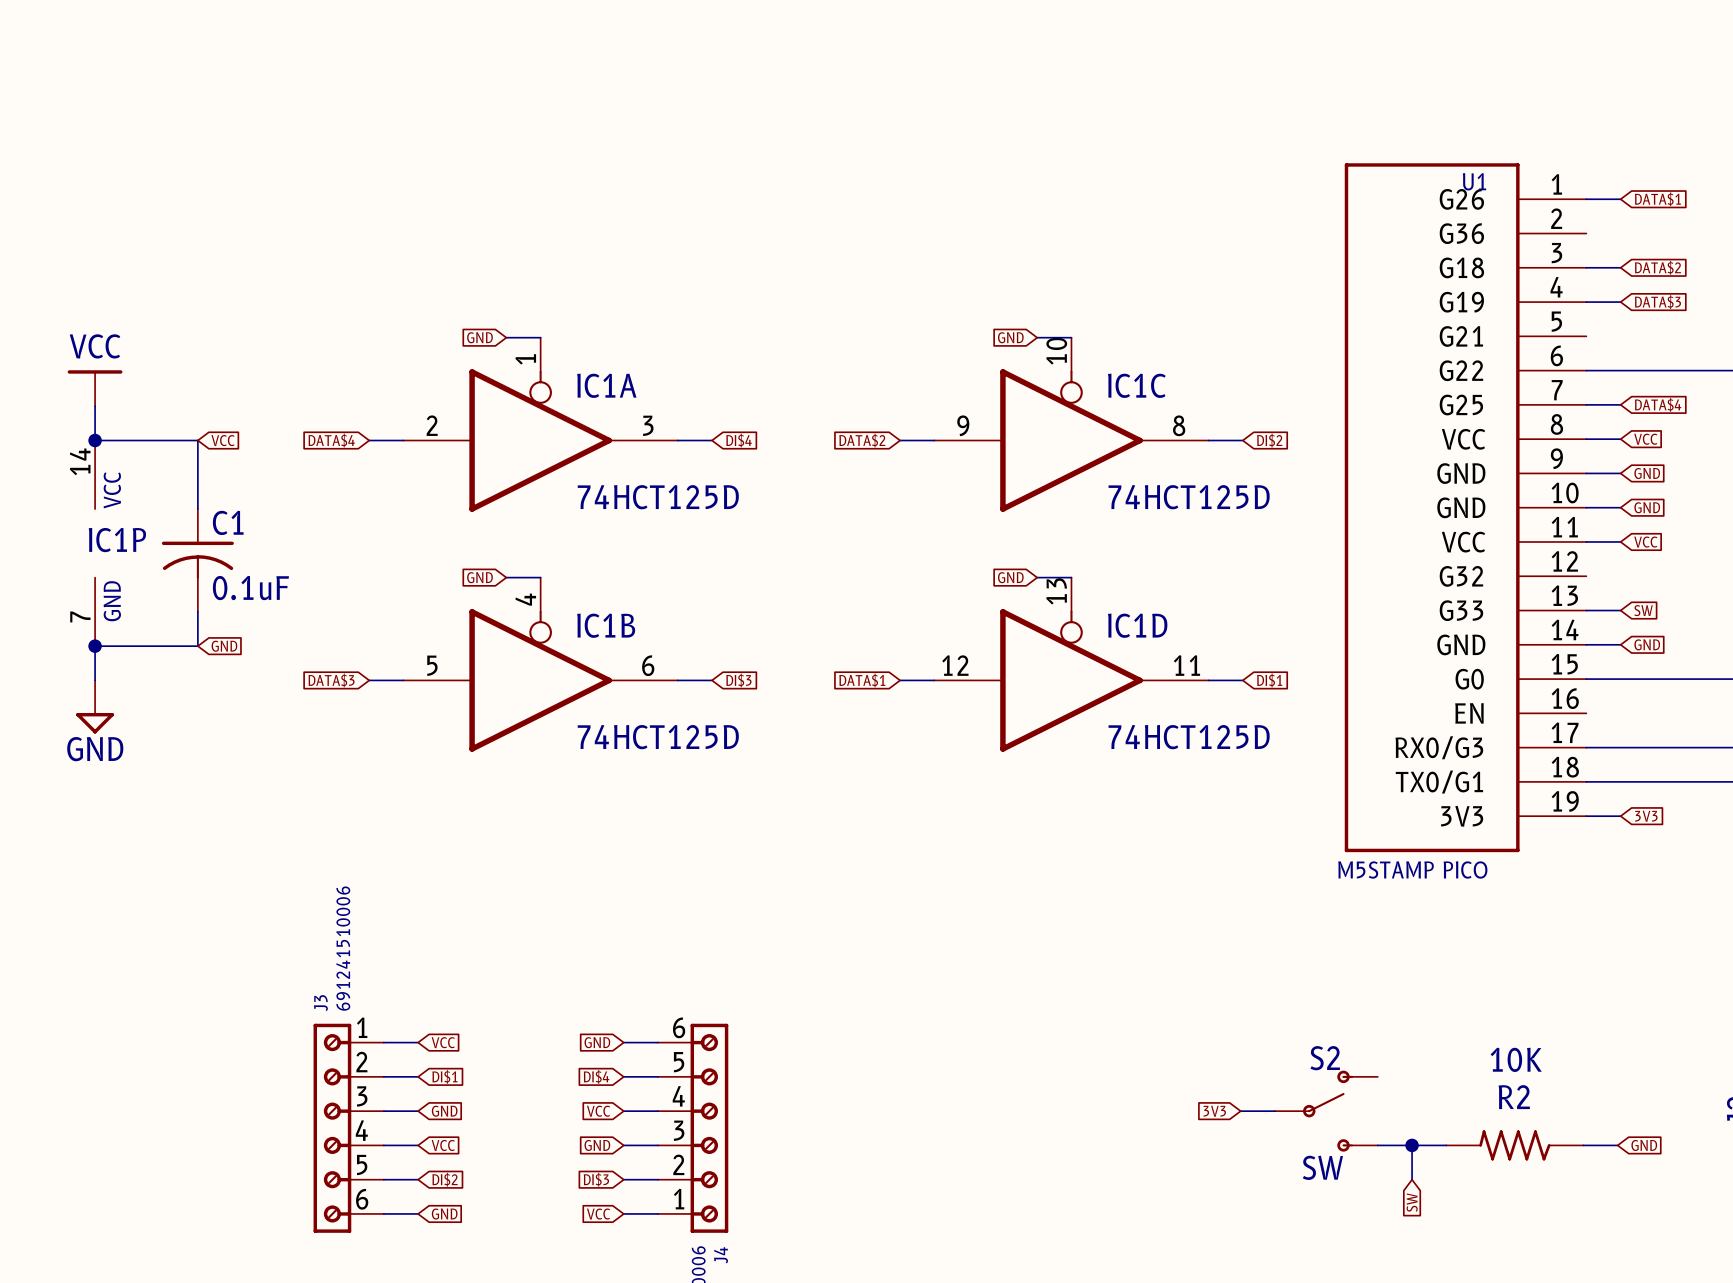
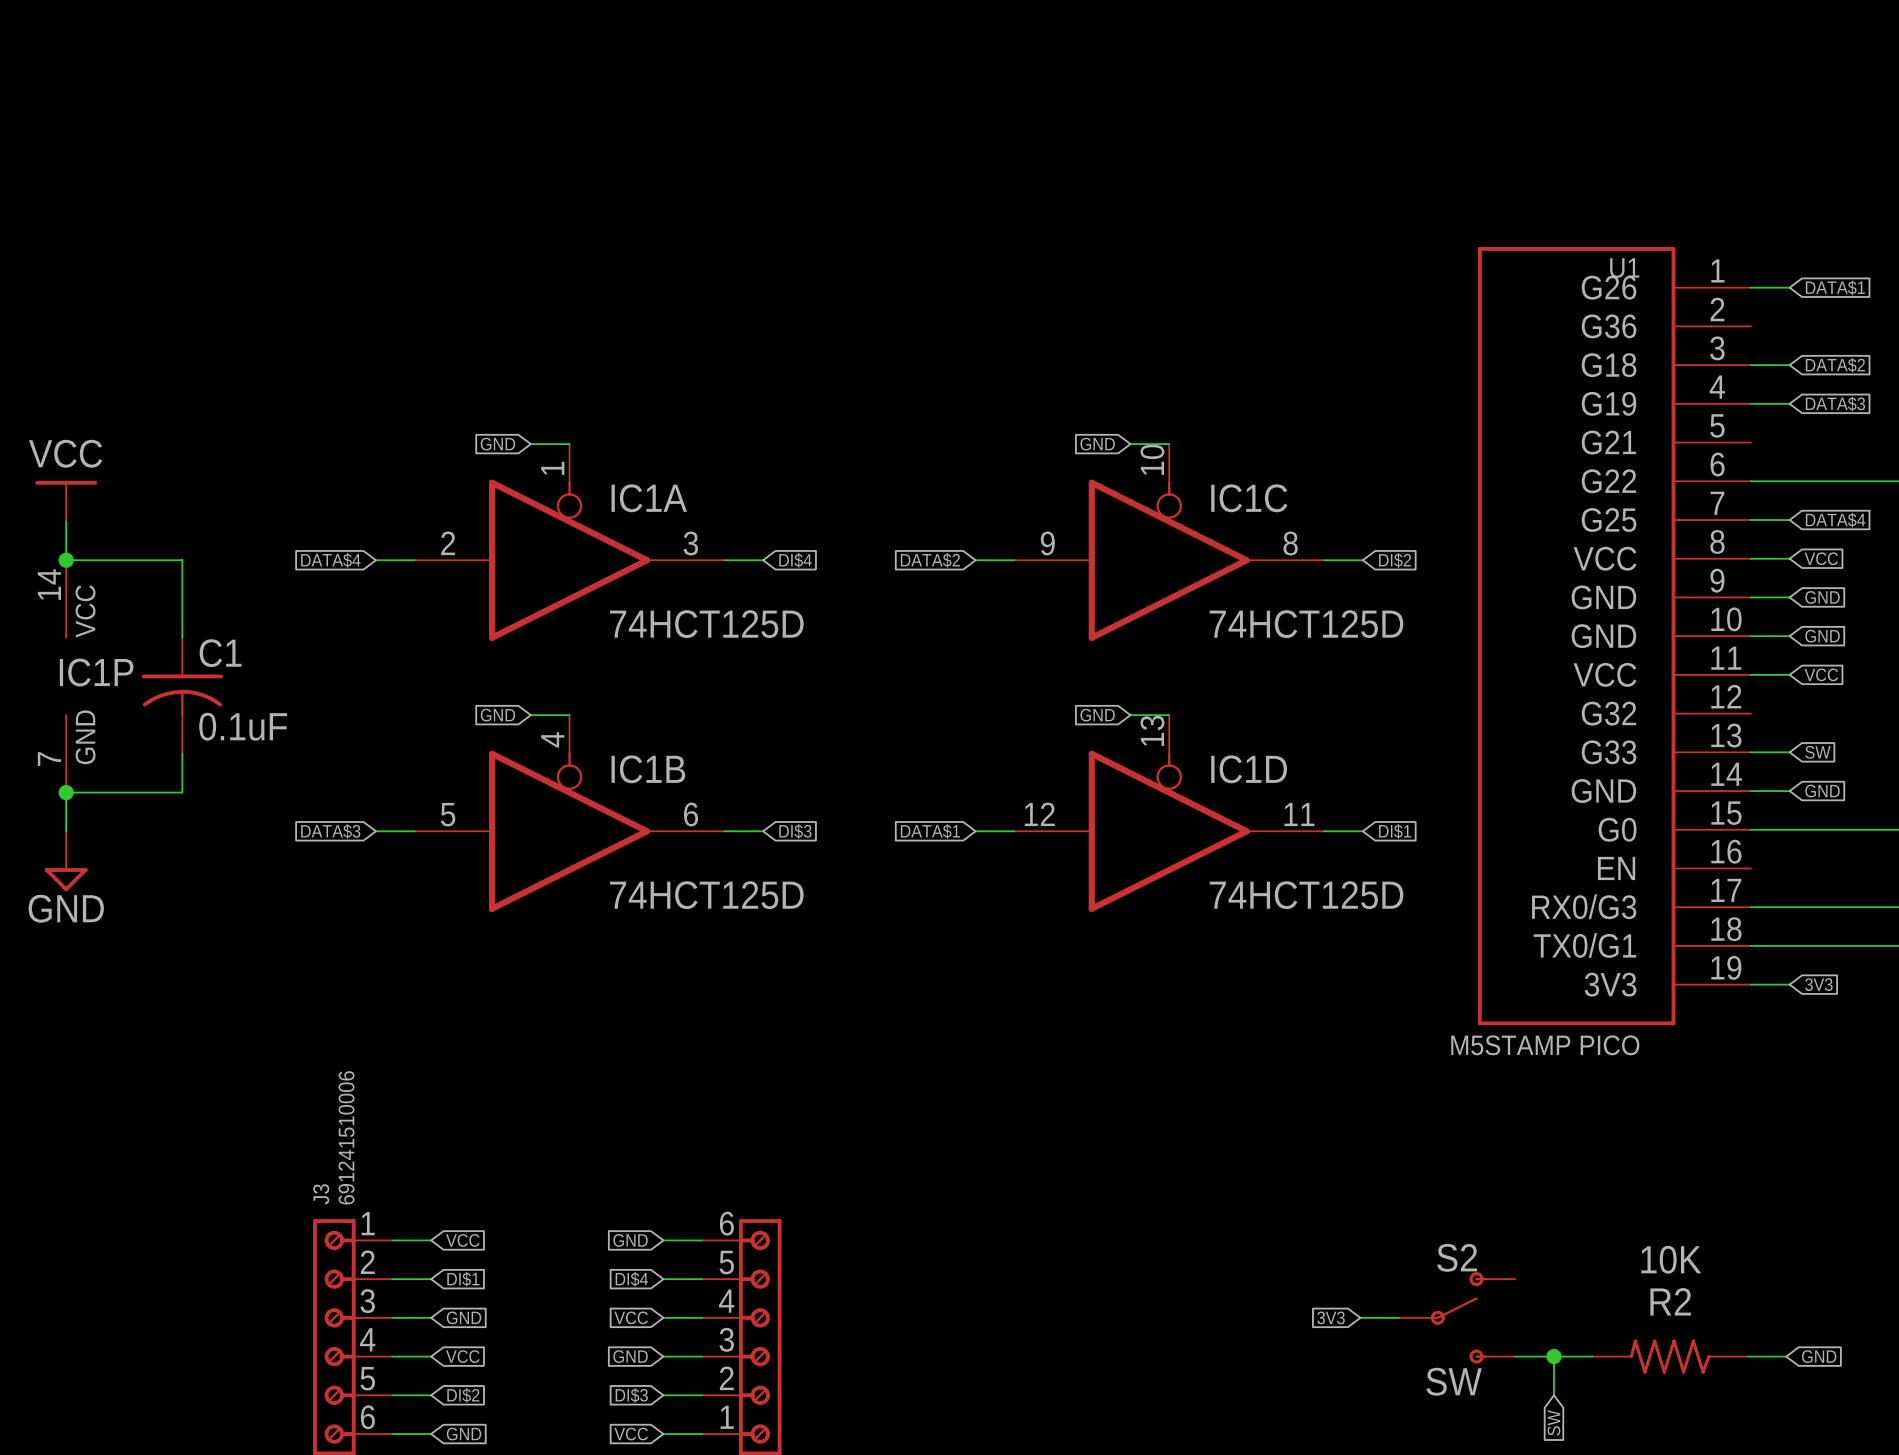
global label: VCC (223, 440) -> none
global label: GND (224, 646) -> none

